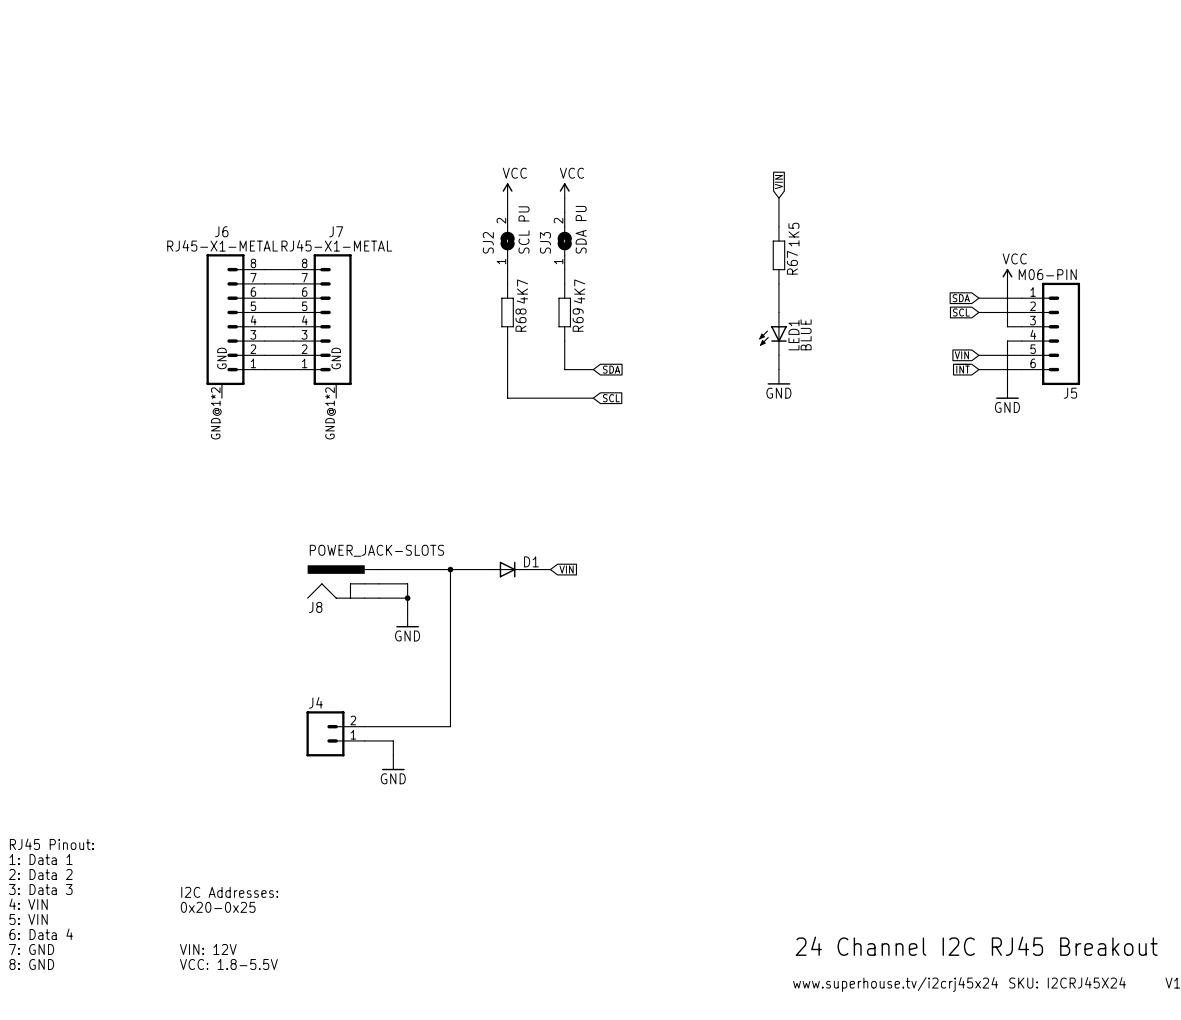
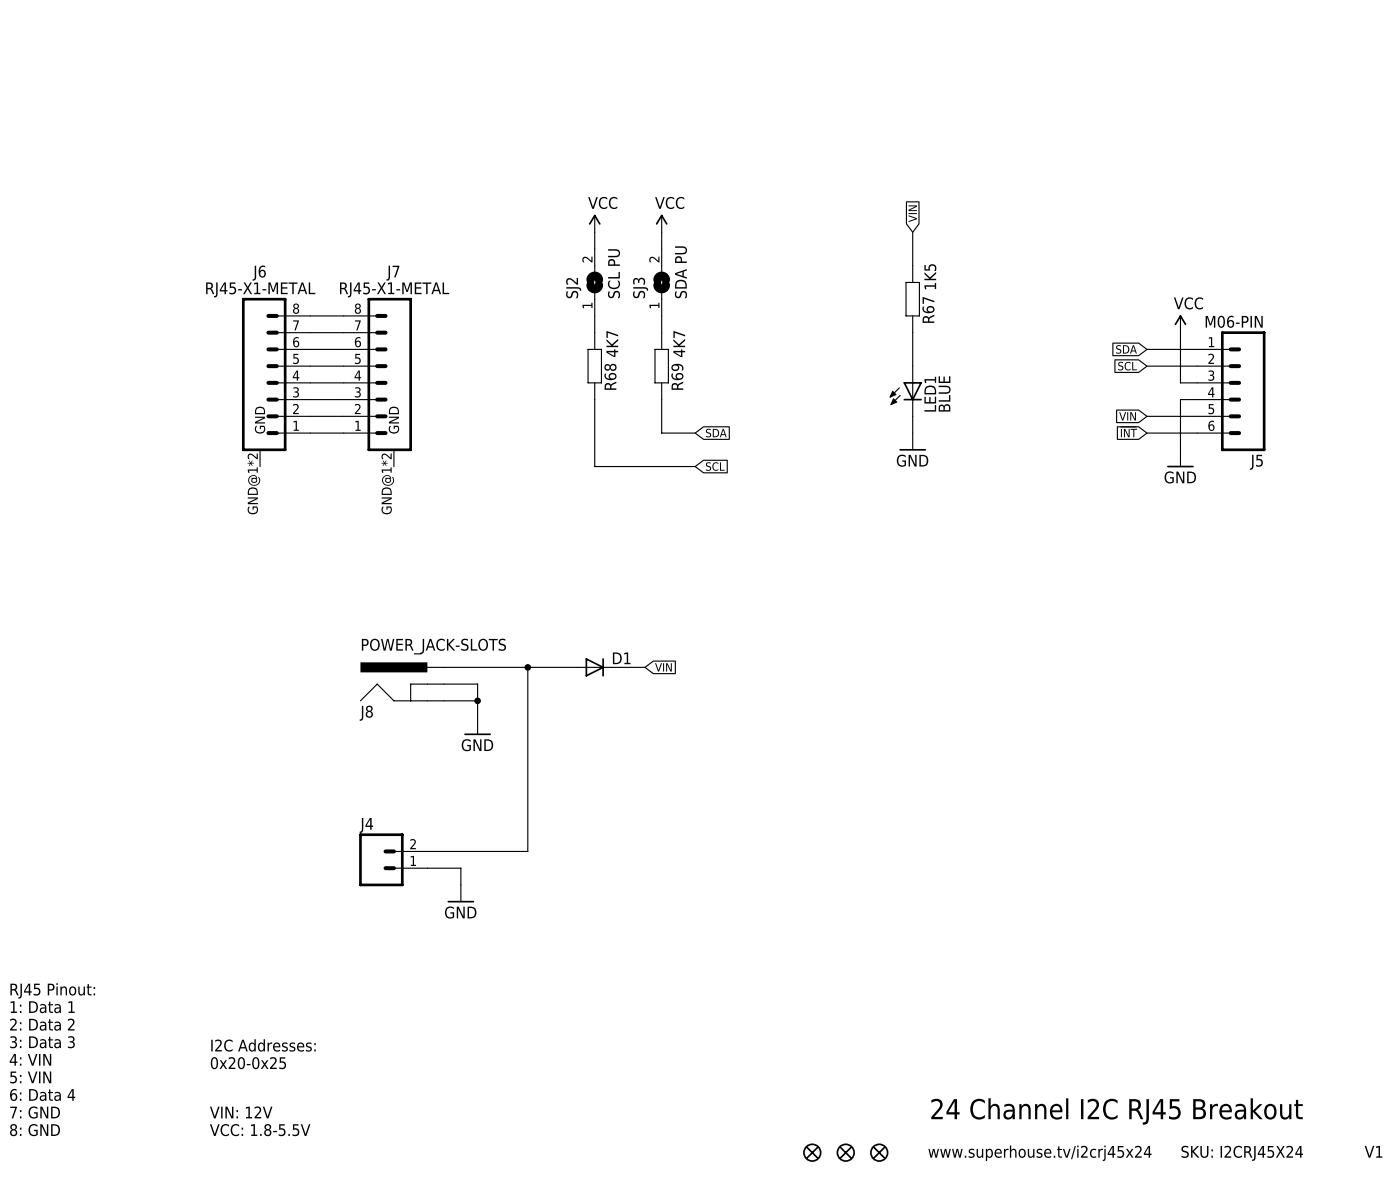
part: none -> (812, 1152)
part: none -> (845, 1152)
part: none -> (879, 1152)

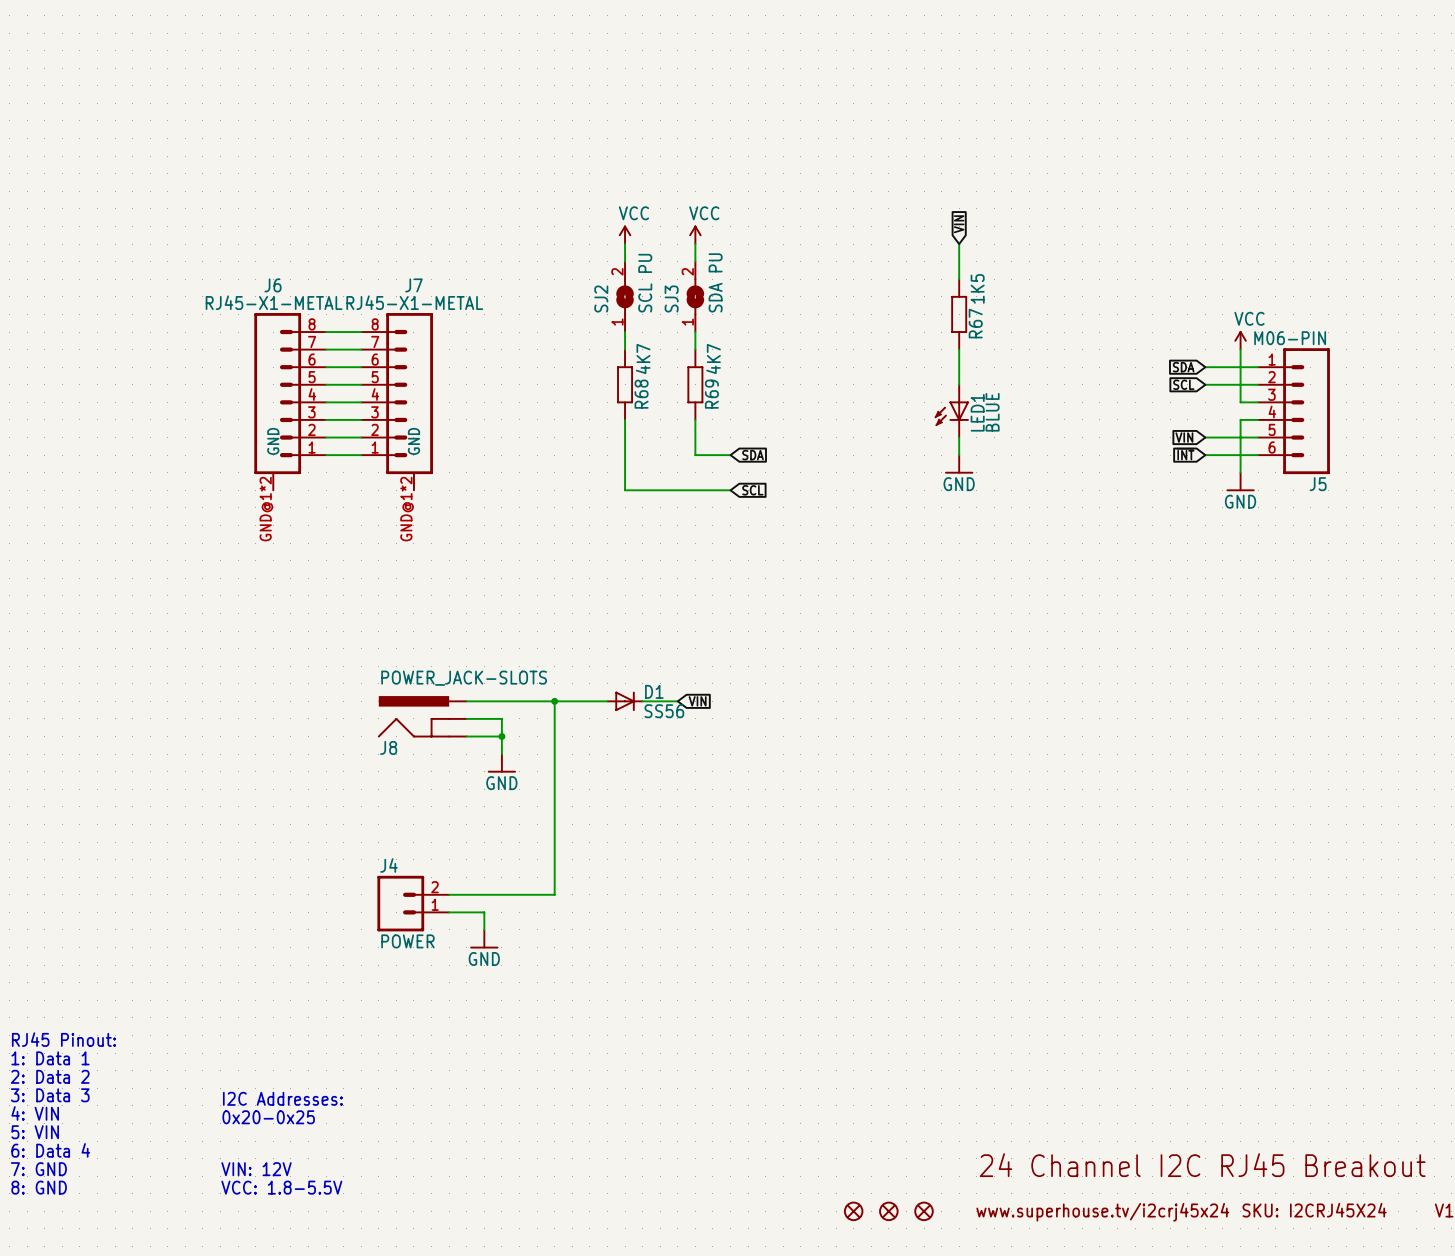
D1 value: none -> SS56 (664, 711)
J4 value: none -> POWER (407, 941)

